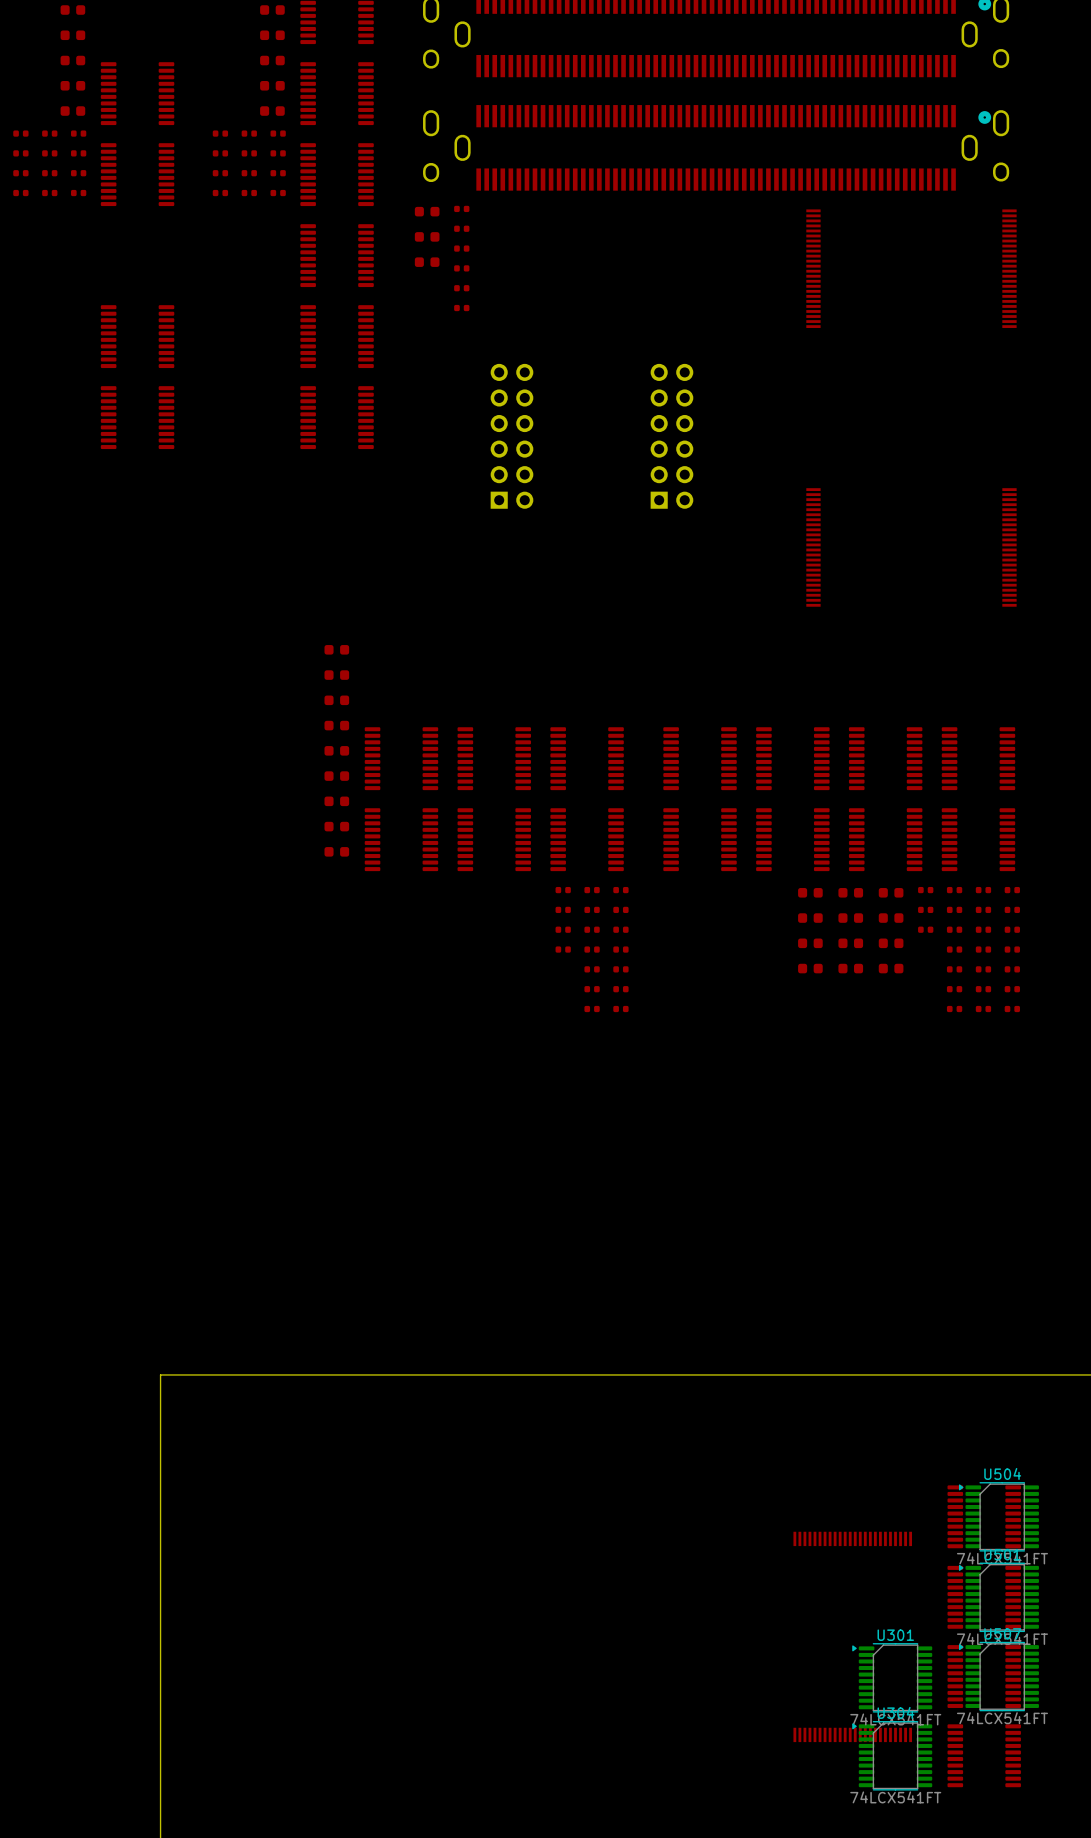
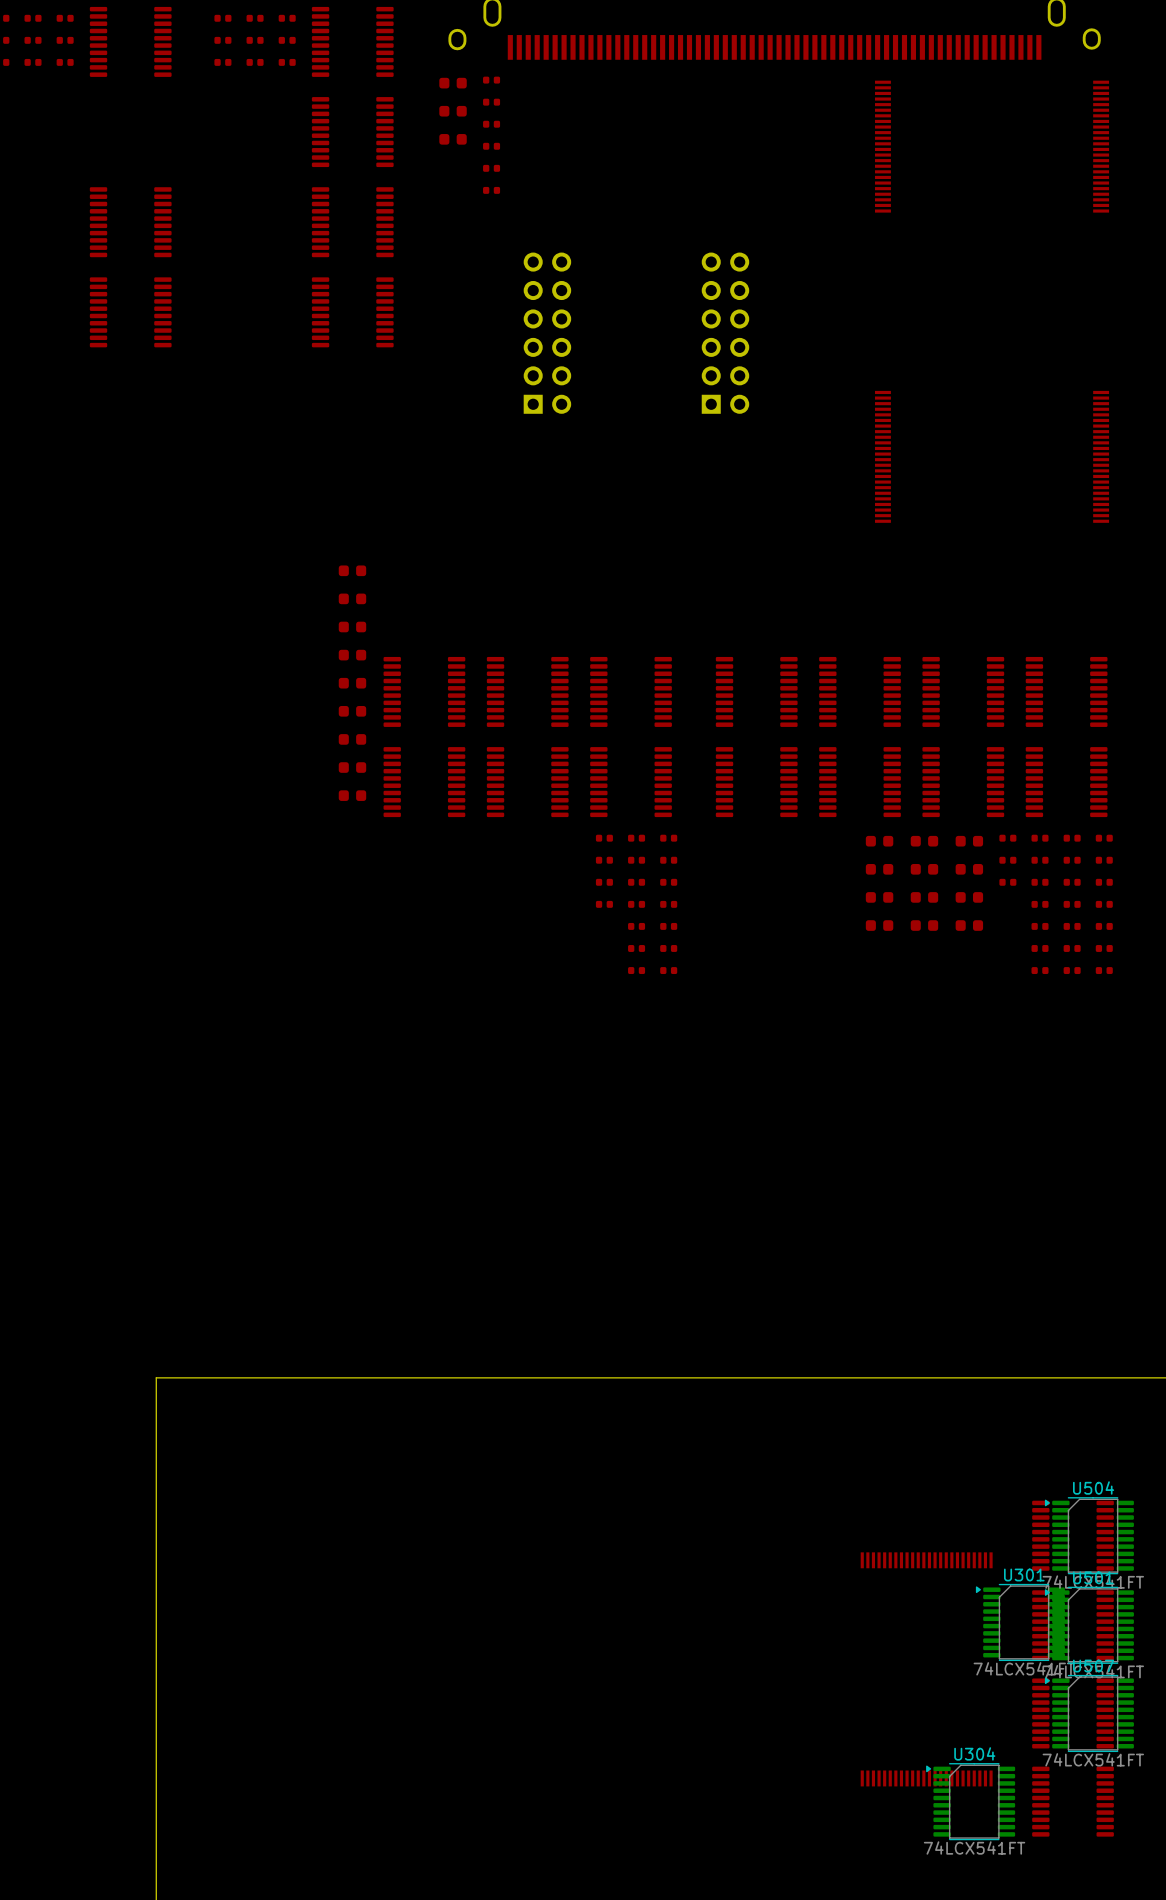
U301 position: (892, 1677) -> (1020, 1622)

